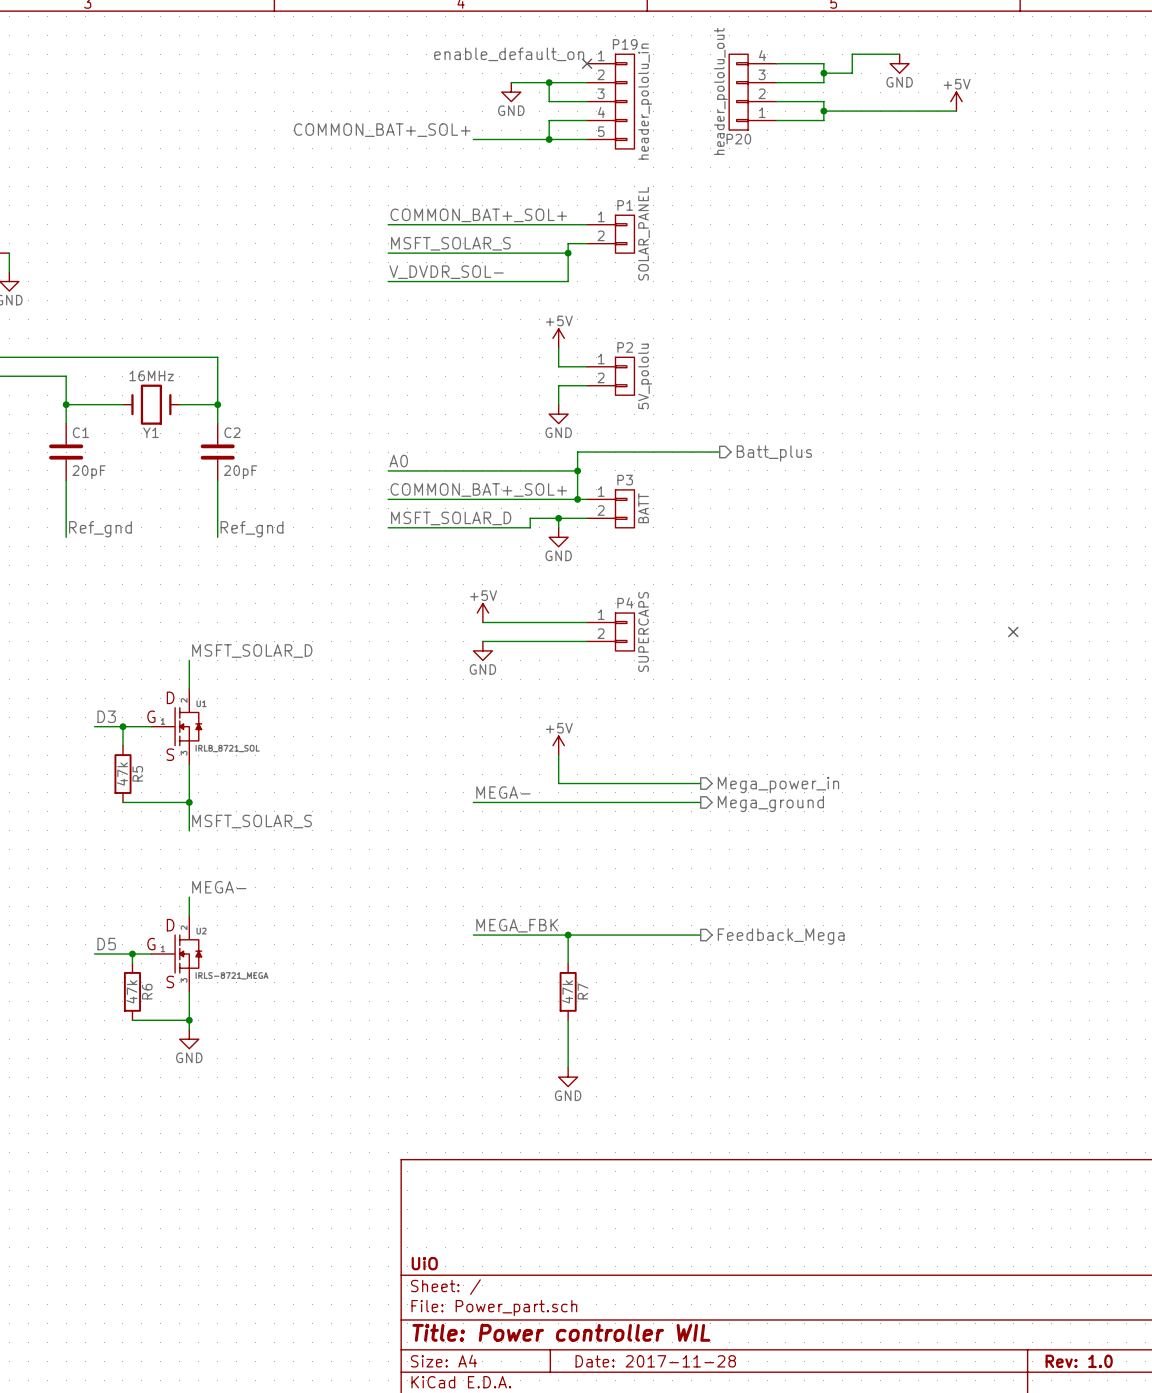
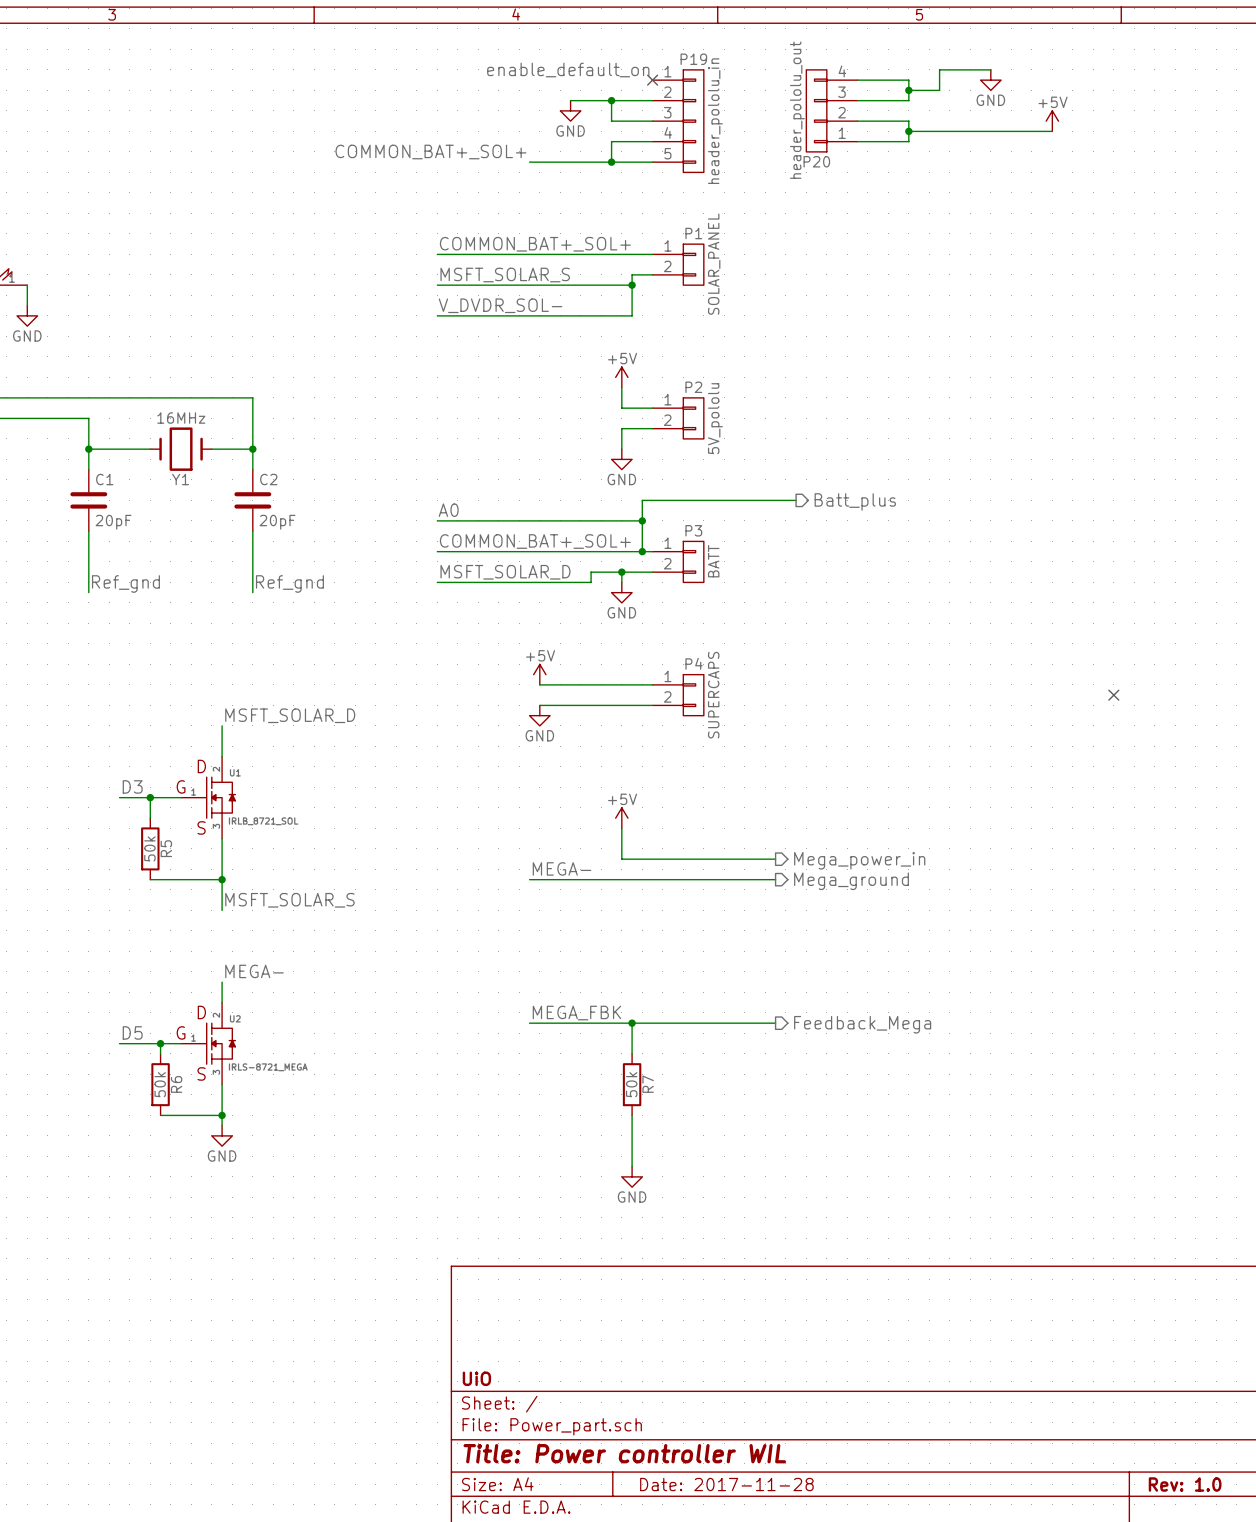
R5 value: 47k (122, 774) -> 50k (149, 848)
R6 value: 47k (131, 991) -> 50k (160, 1084)
R7 value: 47k (567, 991) -> 50k (631, 1084)

